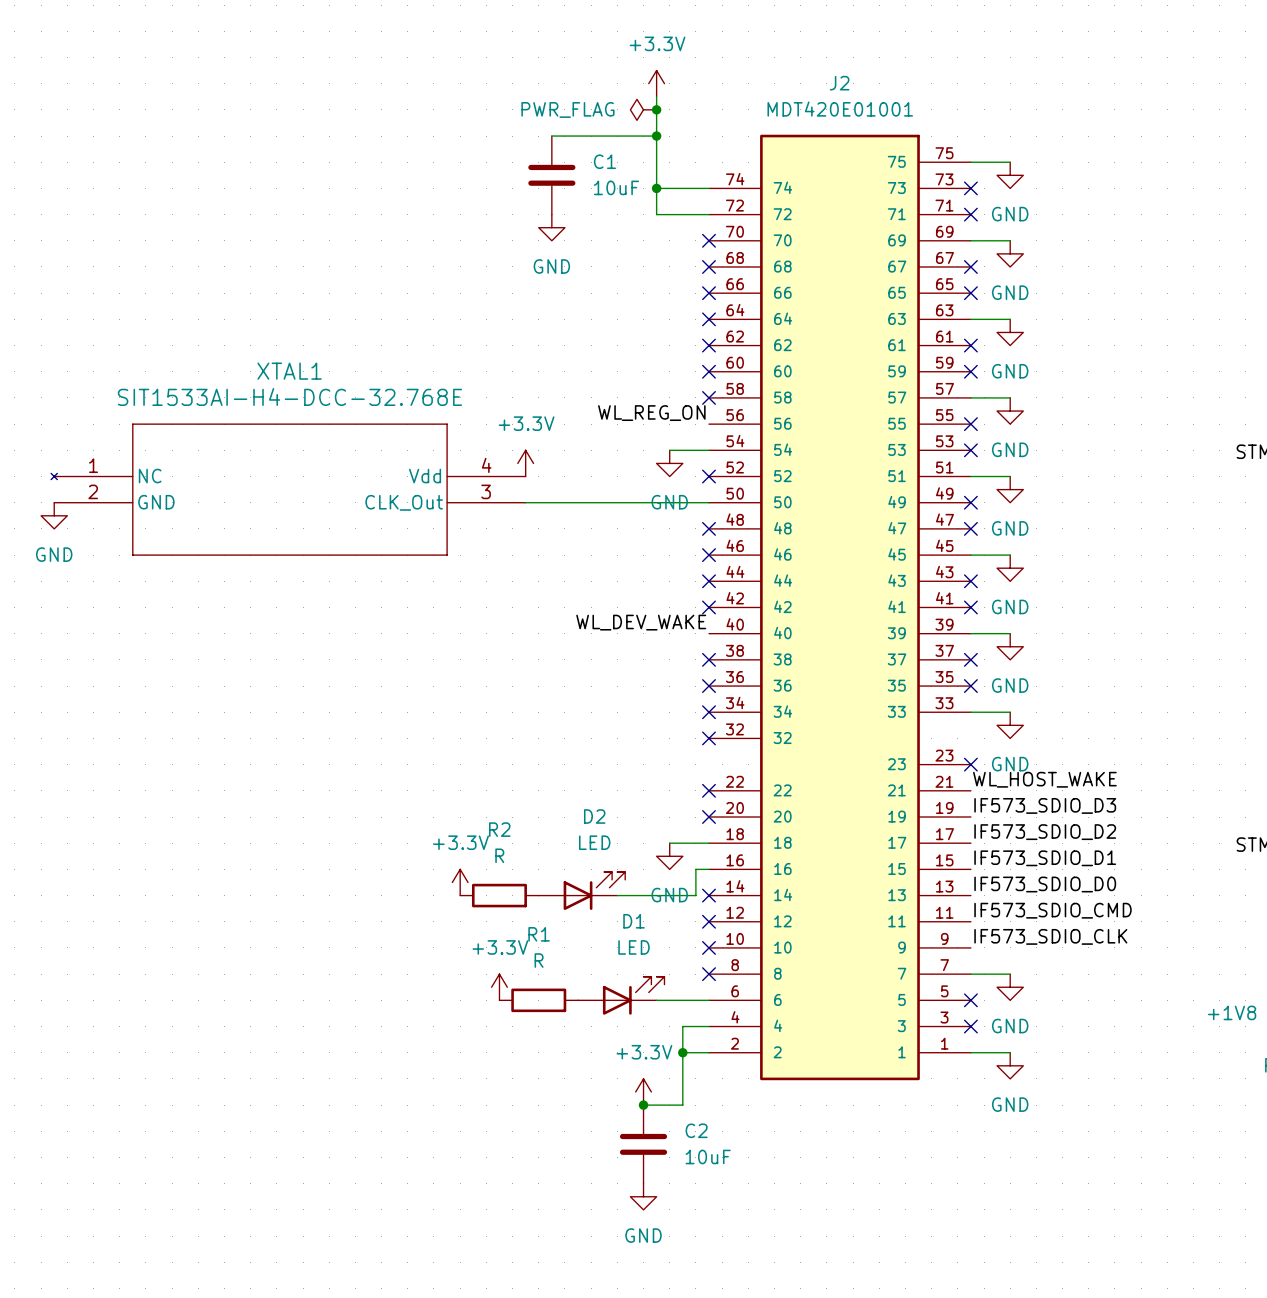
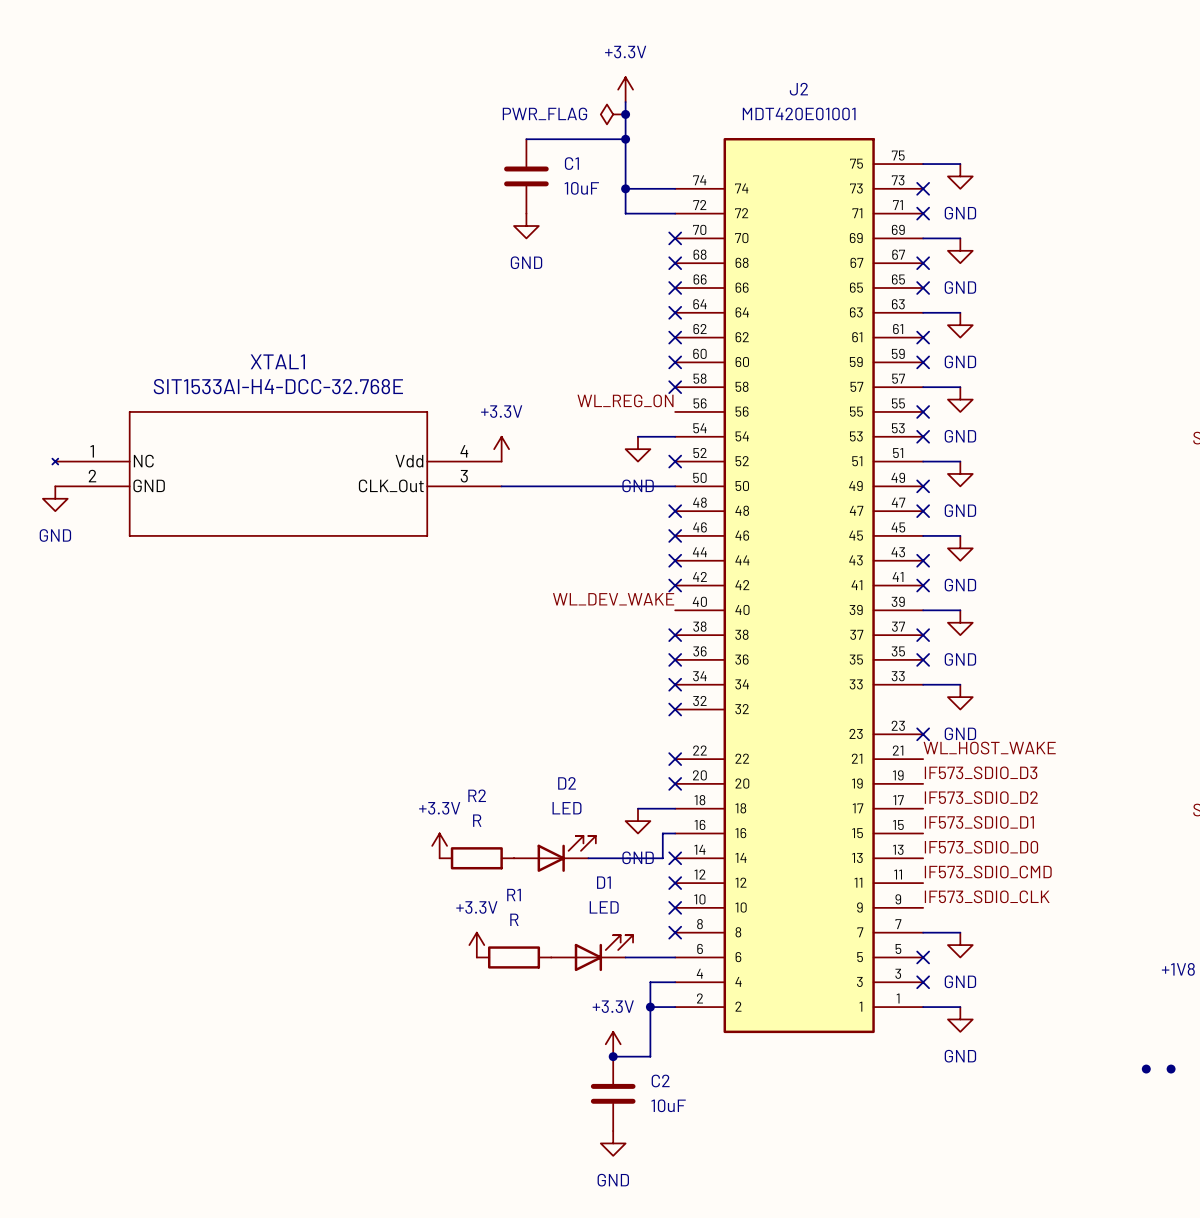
junction: none -> (1146, 1069)
junction: none -> (1171, 1069)

